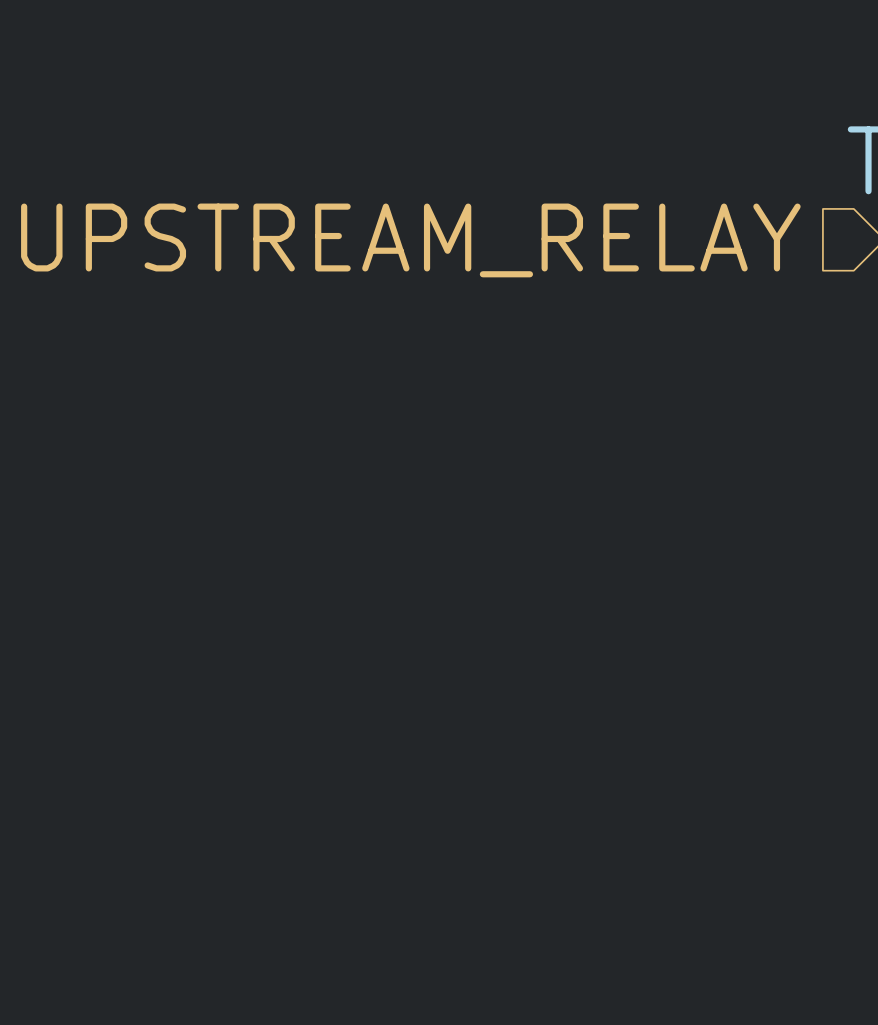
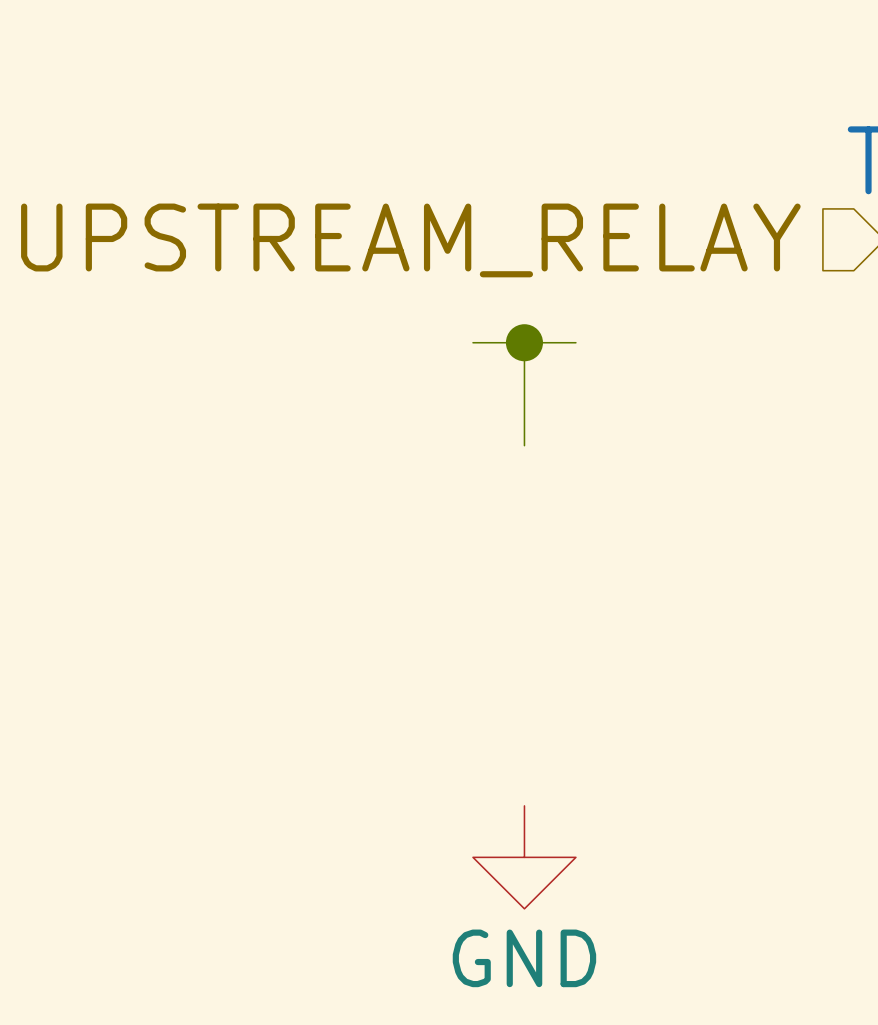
wire: none -> (472, 342) (575, 342)
wire: none -> (524, 342) (524, 445)
junction: none -> (524, 342)
power symbol: none -> GND (524, 857)

